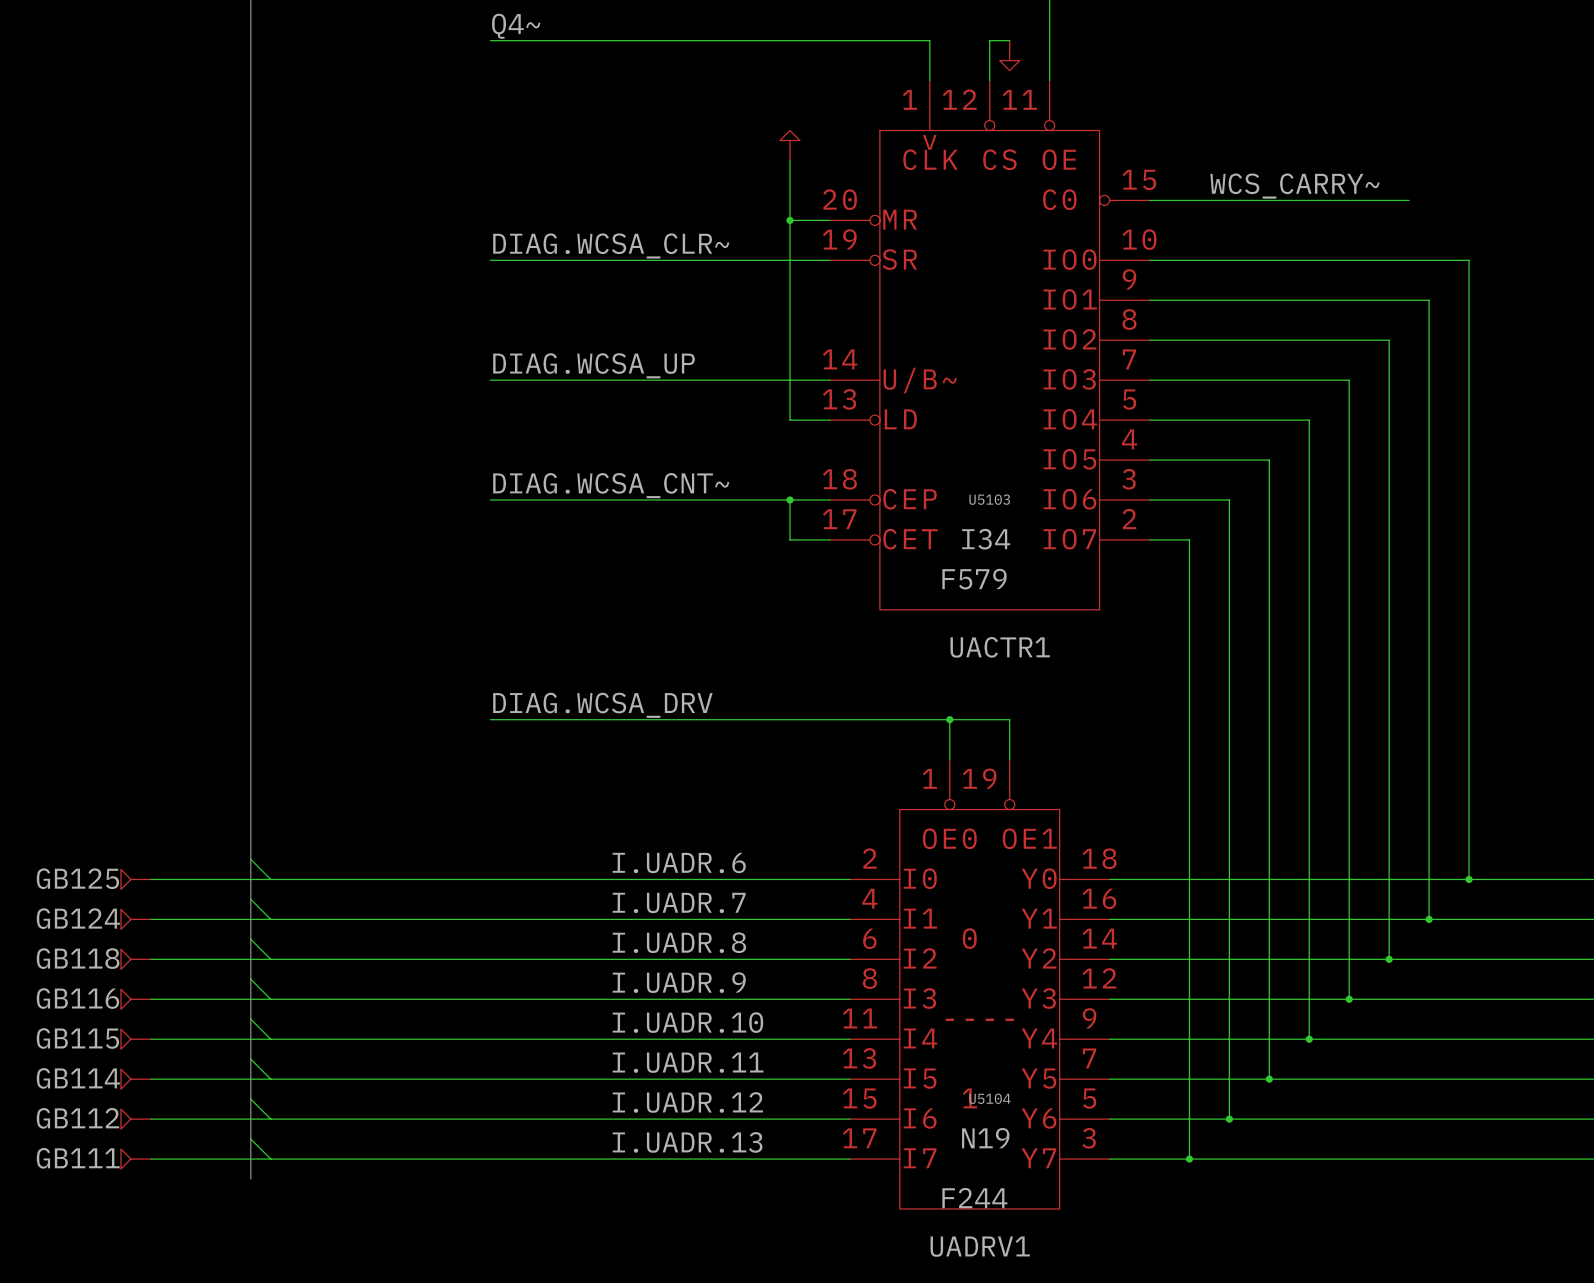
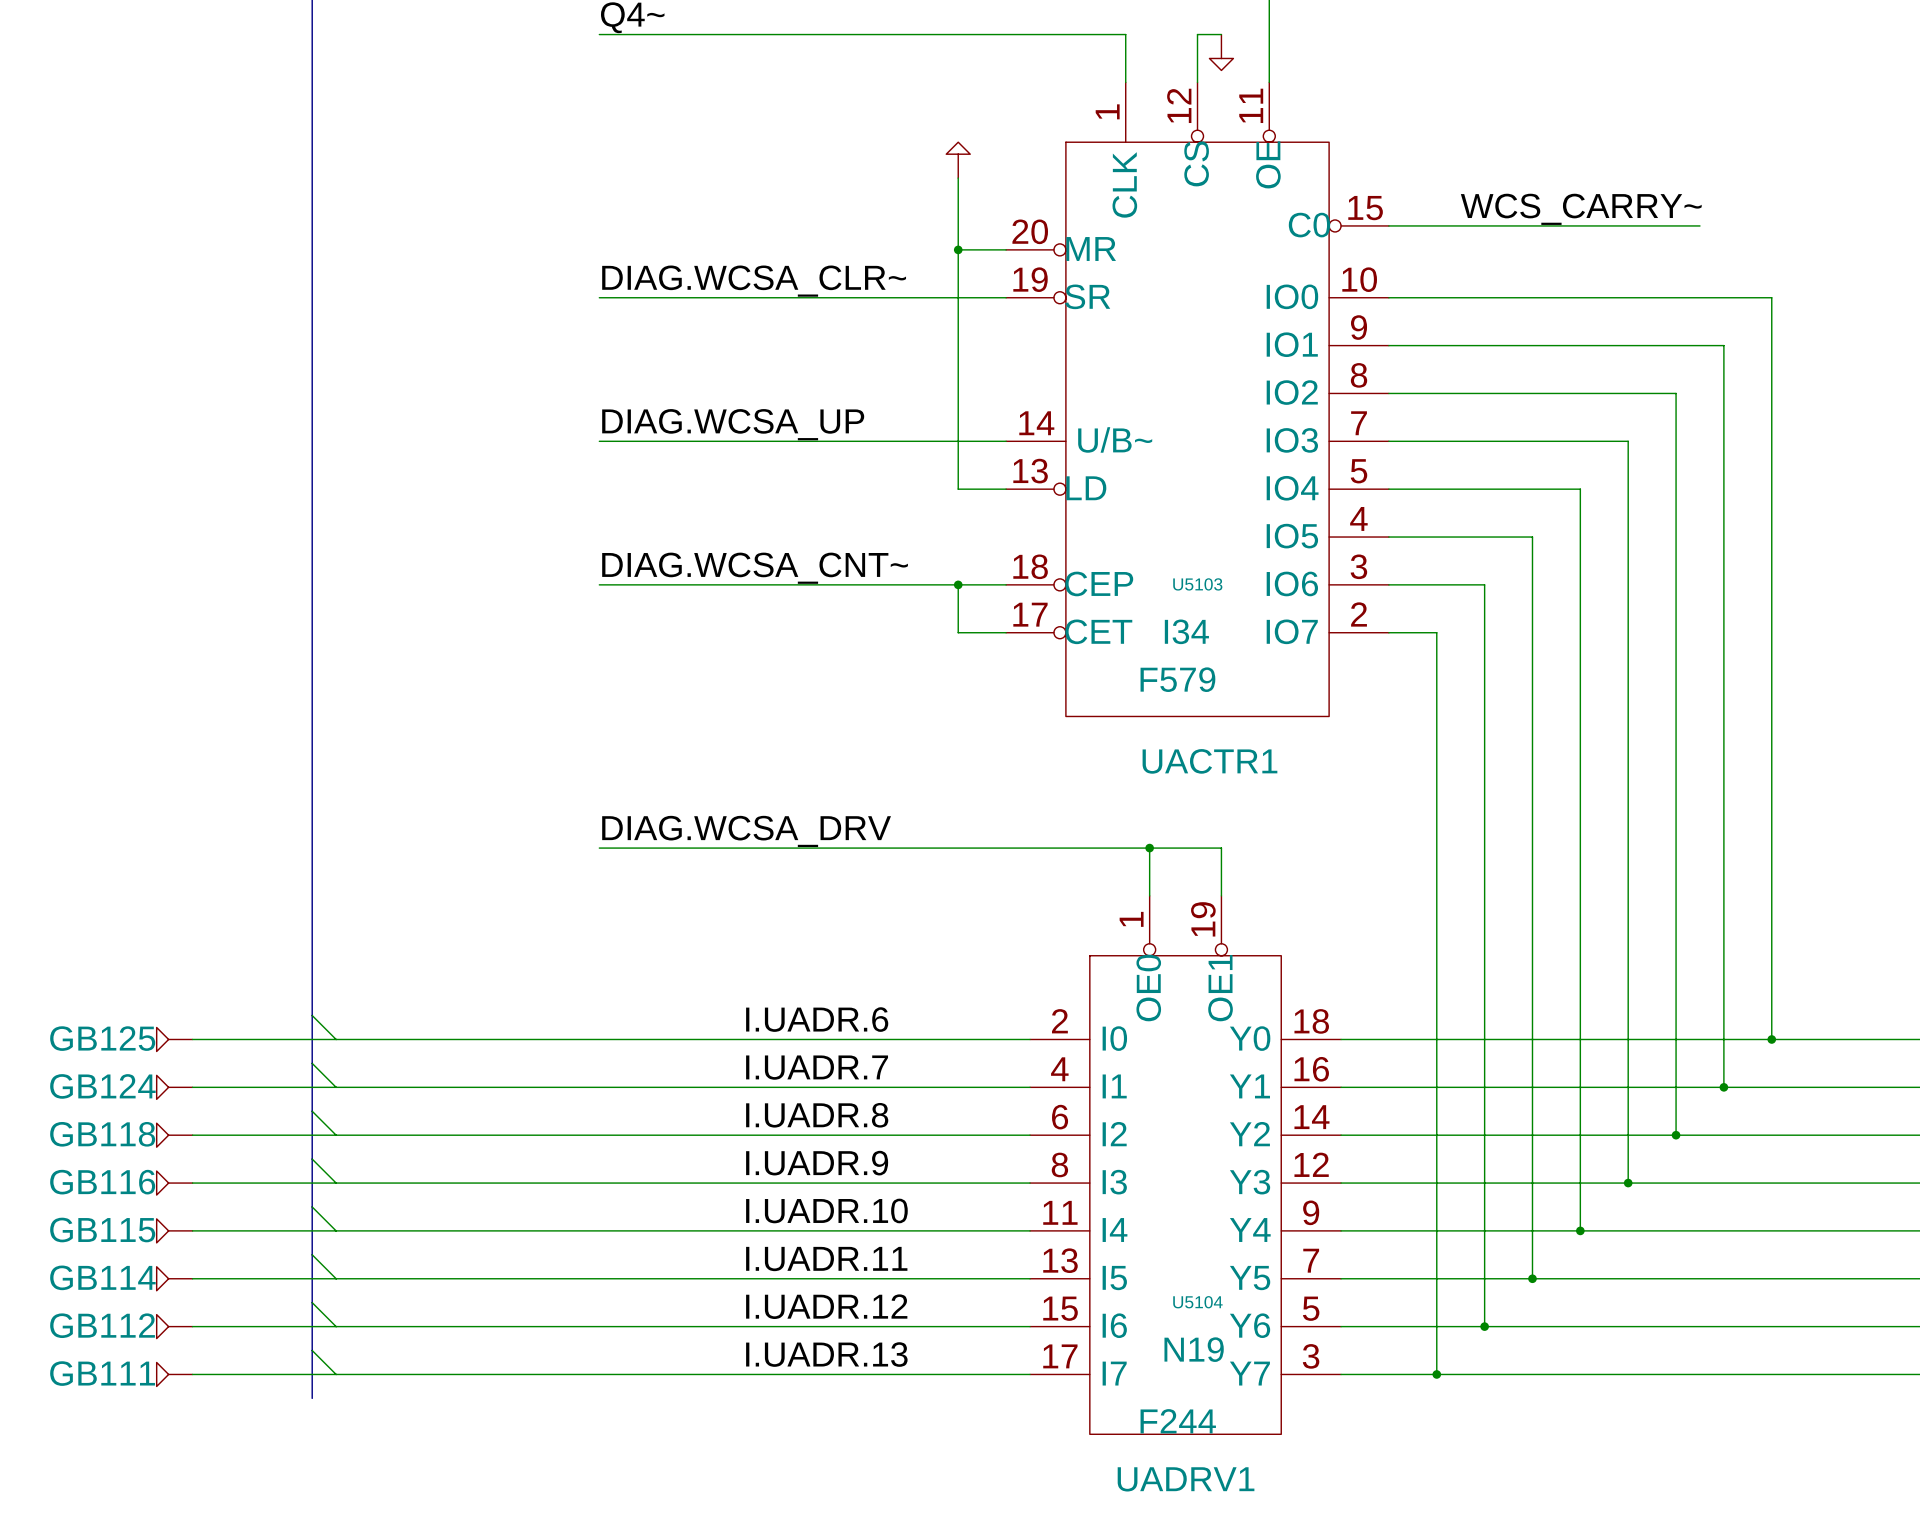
U5103 symbol: [829, 80, 1150, 610] -> [1006, 82, 1389, 717]
U5104 symbol: [849, 759, 1110, 1209] -> [1030, 895, 1342, 1435]

